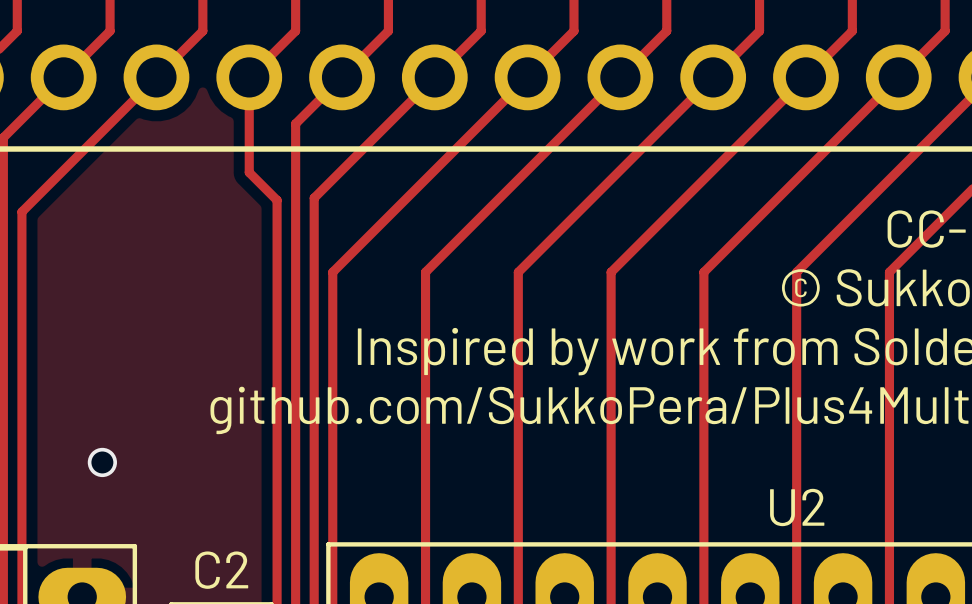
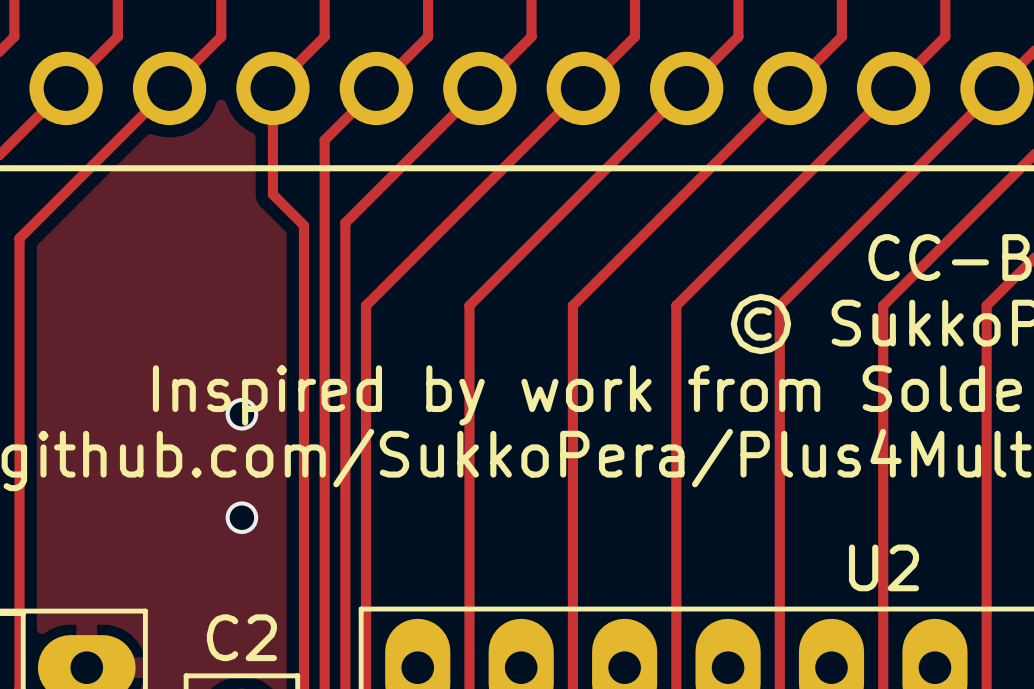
via: none -> (241, 414)
via: (102, 462) -> none
via: none -> (241, 517)

